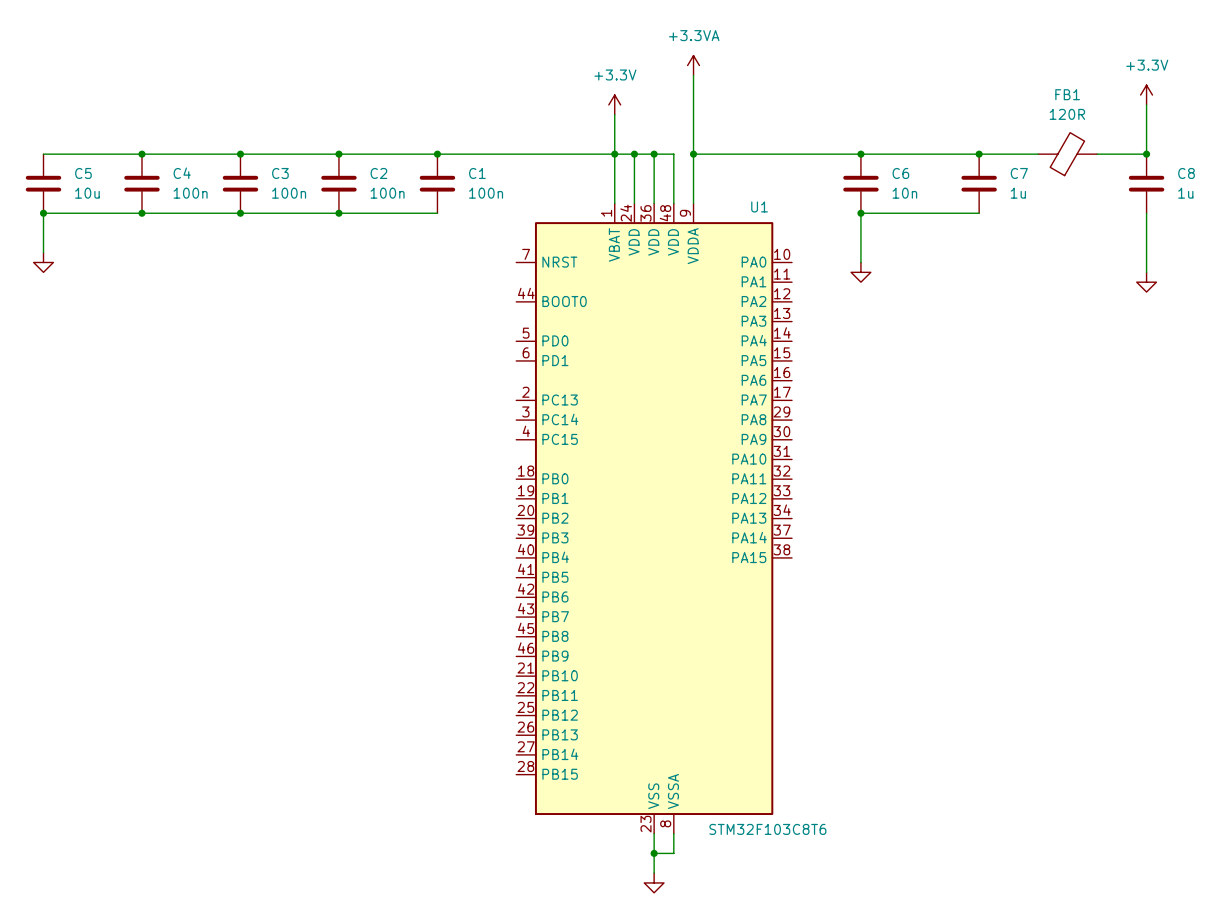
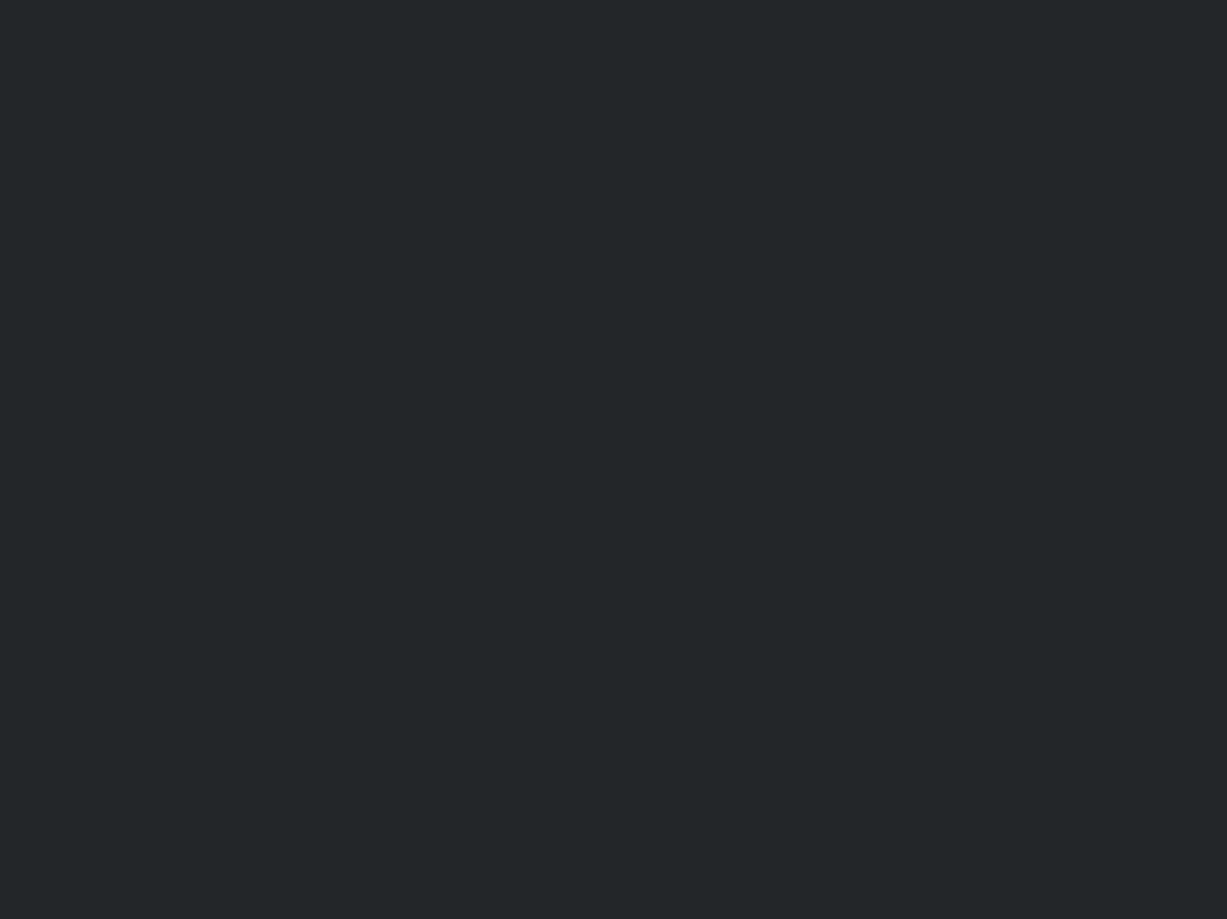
power symbol: +3.3VA (693, 65) -> none
wire: (693, 75) (693, 203) -> none
power symbol: +3.3V (1146, 95) -> none
power symbol: +3.3V (614, 104) -> none
wire: (1146, 104) (1146, 154) (1097, 154) -> none
wire: (614, 114) (614, 203) -> none
wire: (43, 154) (673, 154) (673, 203) -> none
junction: (141, 154) -> none
junction: (240, 154) -> none
junction: (338, 154) -> none
junction: (437, 154) -> none
junction: (614, 154) -> none
wire: (634, 154) (634, 203) -> none
junction: (634, 154) -> none
wire: (654, 154) (654, 203) -> none
junction: (654, 154) -> none
wire: (693, 154) (1038, 154) -> none
junction: (693, 154) -> none
junction: (860, 154) -> none
junction: (979, 154) -> none
FB1: 120R (1067, 154) -> none
junction: (1146, 154) -> none
C5: 10u (43, 183) -> none
C4: 100n (141, 183) -> none
C3: 100n (240, 183) -> none
C2: 100n (338, 183) -> none
C1: 100n (437, 183) -> none
C6: 10n (860, 183) -> none
C7: 1u (979, 183) -> none
C8: 1u (1146, 183) -> none
junction: (43, 213) -> none
junction: (141, 213) -> none
junction: (240, 213) -> none
junction: (338, 213) -> none
wire: (437, 213) (43, 213) (43, 252) -> none
junction: (860, 213) -> none
wire: (979, 213) (860, 213) (860, 262) -> none
wire: (1146, 213) (1146, 272) -> none
power symbol: (43, 262) -> none
power symbol: (860, 272) -> none
power symbol: (1146, 282) -> none
U1: STM32F103C8T6 (654, 518) -> none
wire: (654, 833) (654, 873) -> none
wire: (673, 833) (673, 853) (654, 853) -> none
junction: (654, 853) -> none
power symbol: (654, 882) -> none

